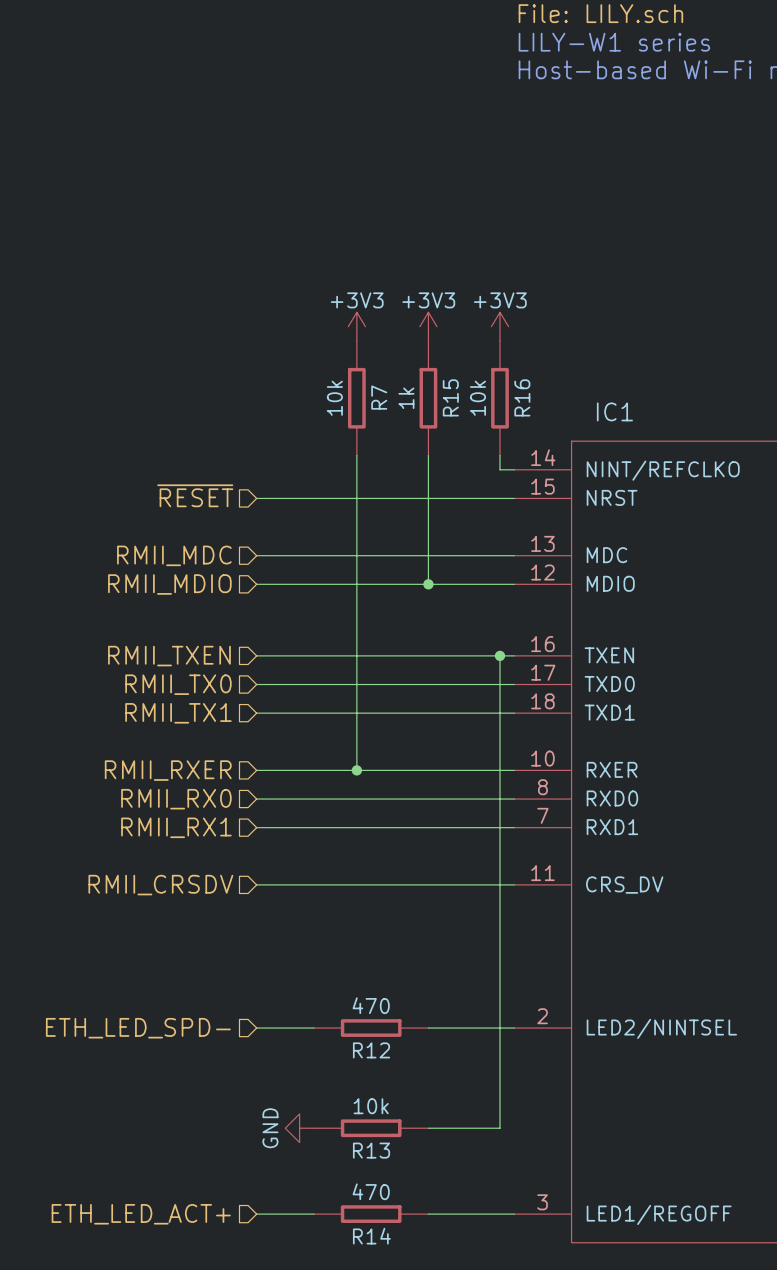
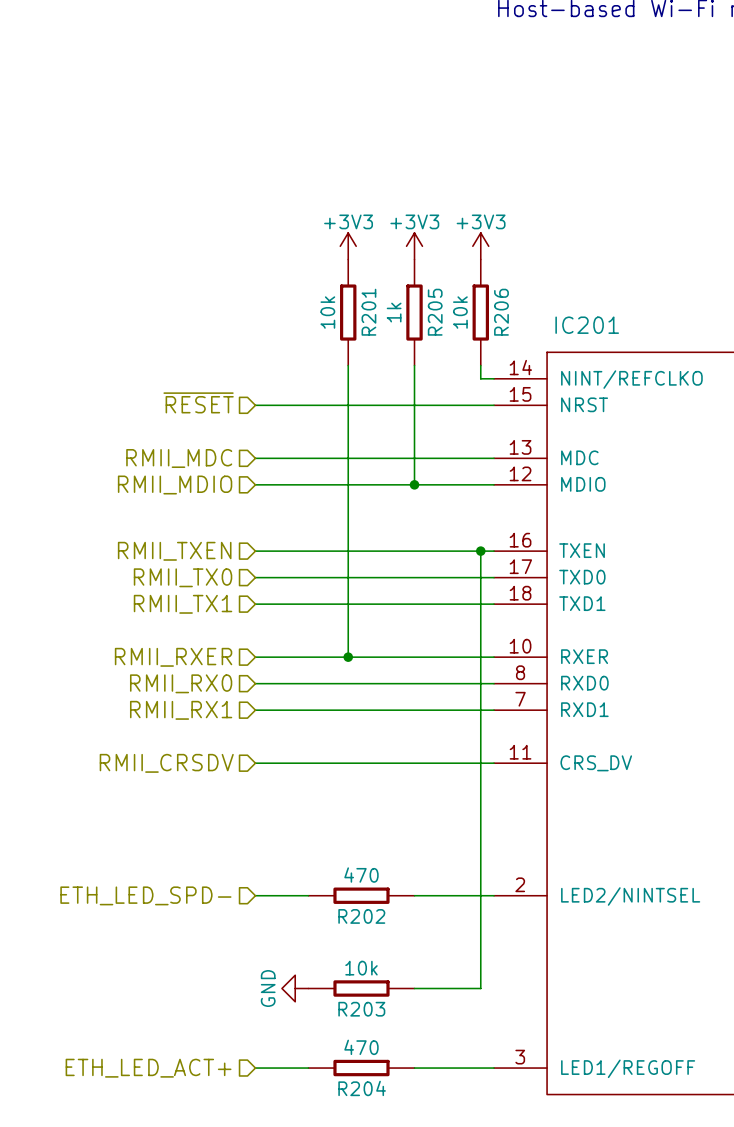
R7 name: R7 (379, 397) -> R201 (368, 312)
R15 name: R15 (450, 397) -> R205 (435, 312)
R16 name: R16 (522, 397) -> R206 (501, 312)
IC1 name: IC1 (614, 411) -> IC201 (587, 325)
R12 name: R12 (371, 1050) -> R202 (361, 916)
R13 name: R13 (371, 1150) -> R203 (361, 1009)
R14 name: R14 (371, 1236) -> R204 (362, 1088)

